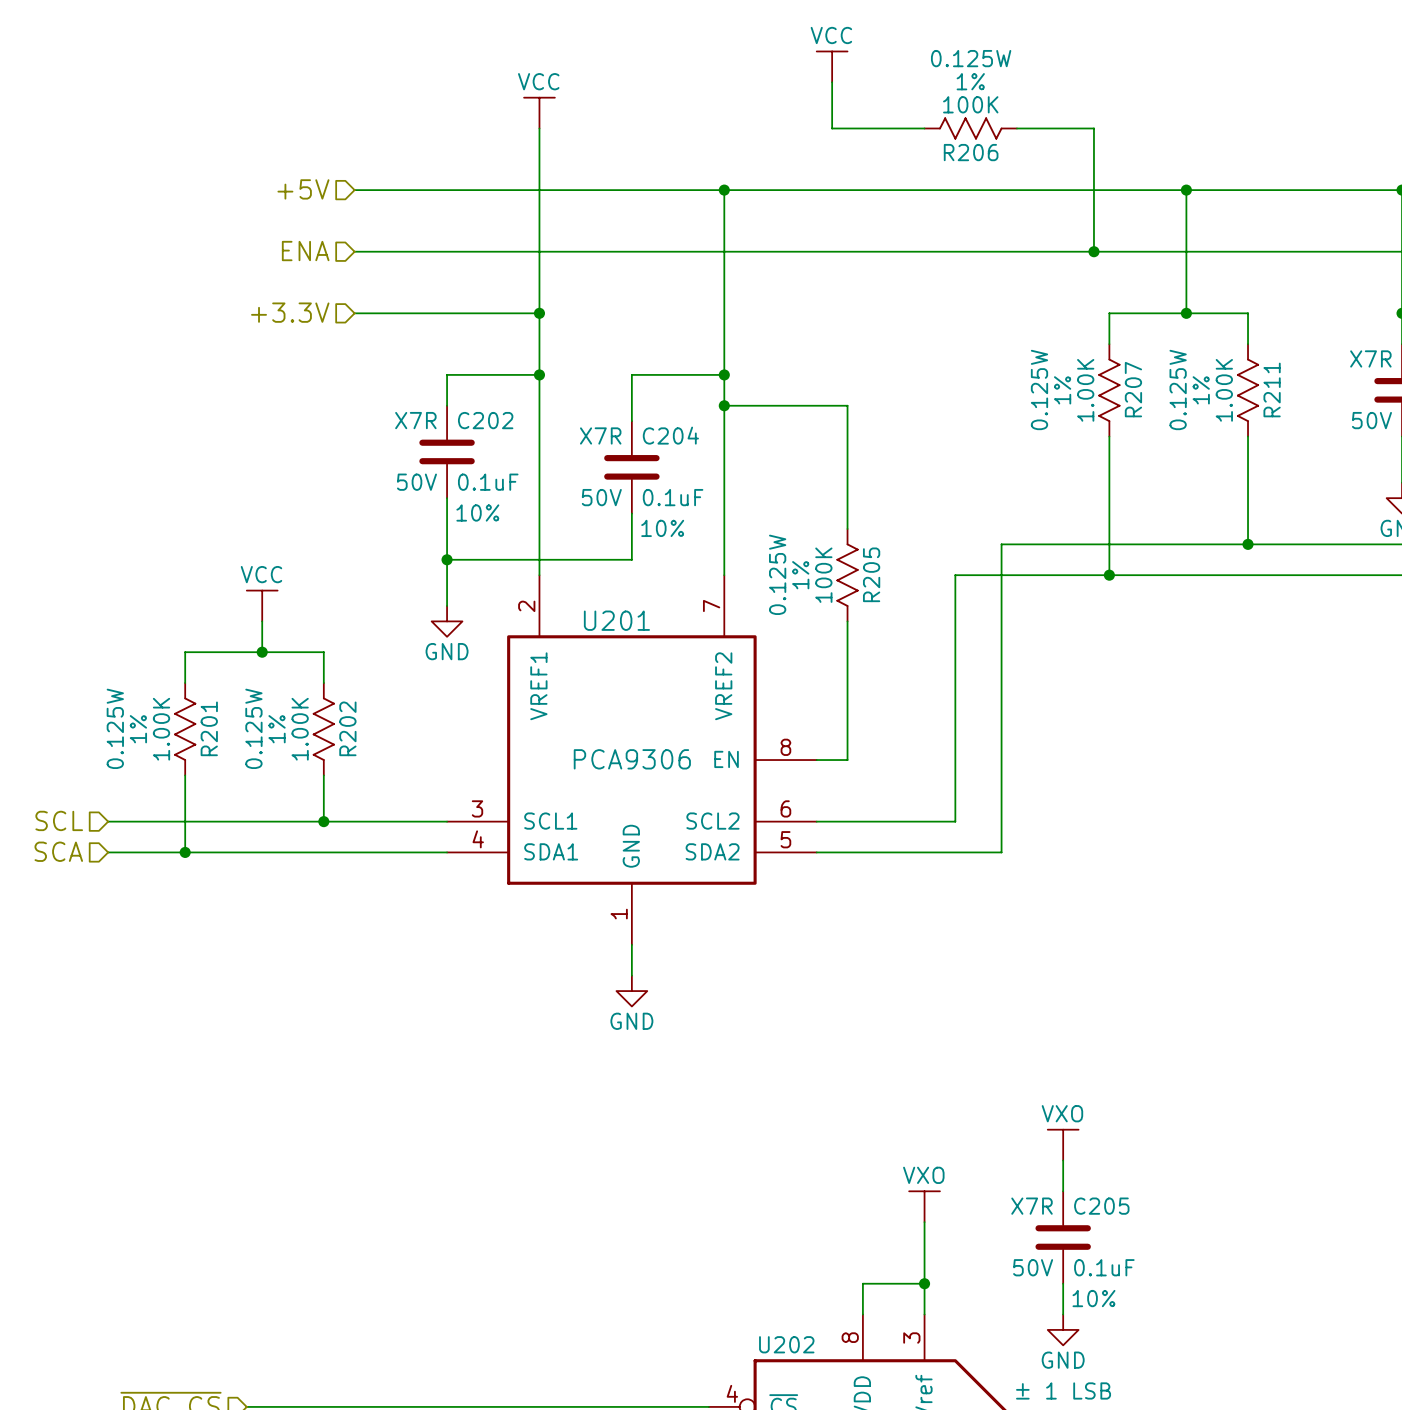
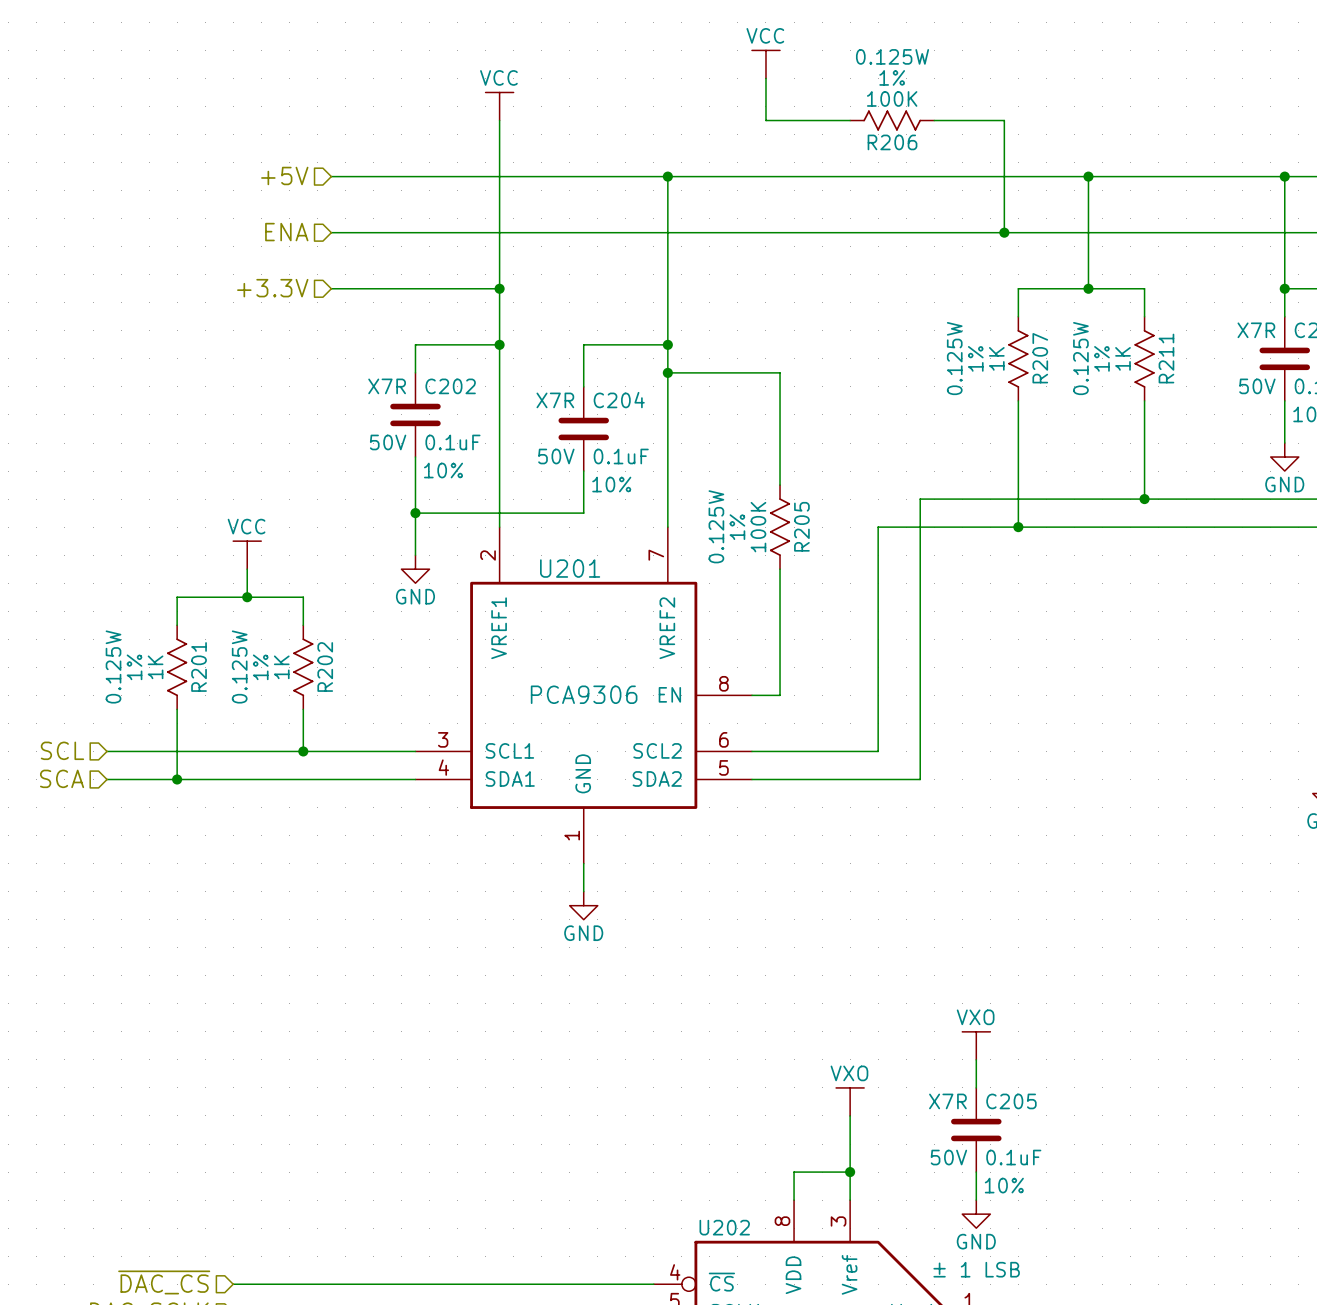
R207 value: 1.00K (1085, 390) -> 1K (996, 358)
R211 value: 1.00K (1224, 390) -> 1K (1122, 358)
R201 value: 1.00K (161, 729) -> 1K (155, 667)
R202 value: 1.00K (300, 729) -> 1K (281, 667)

